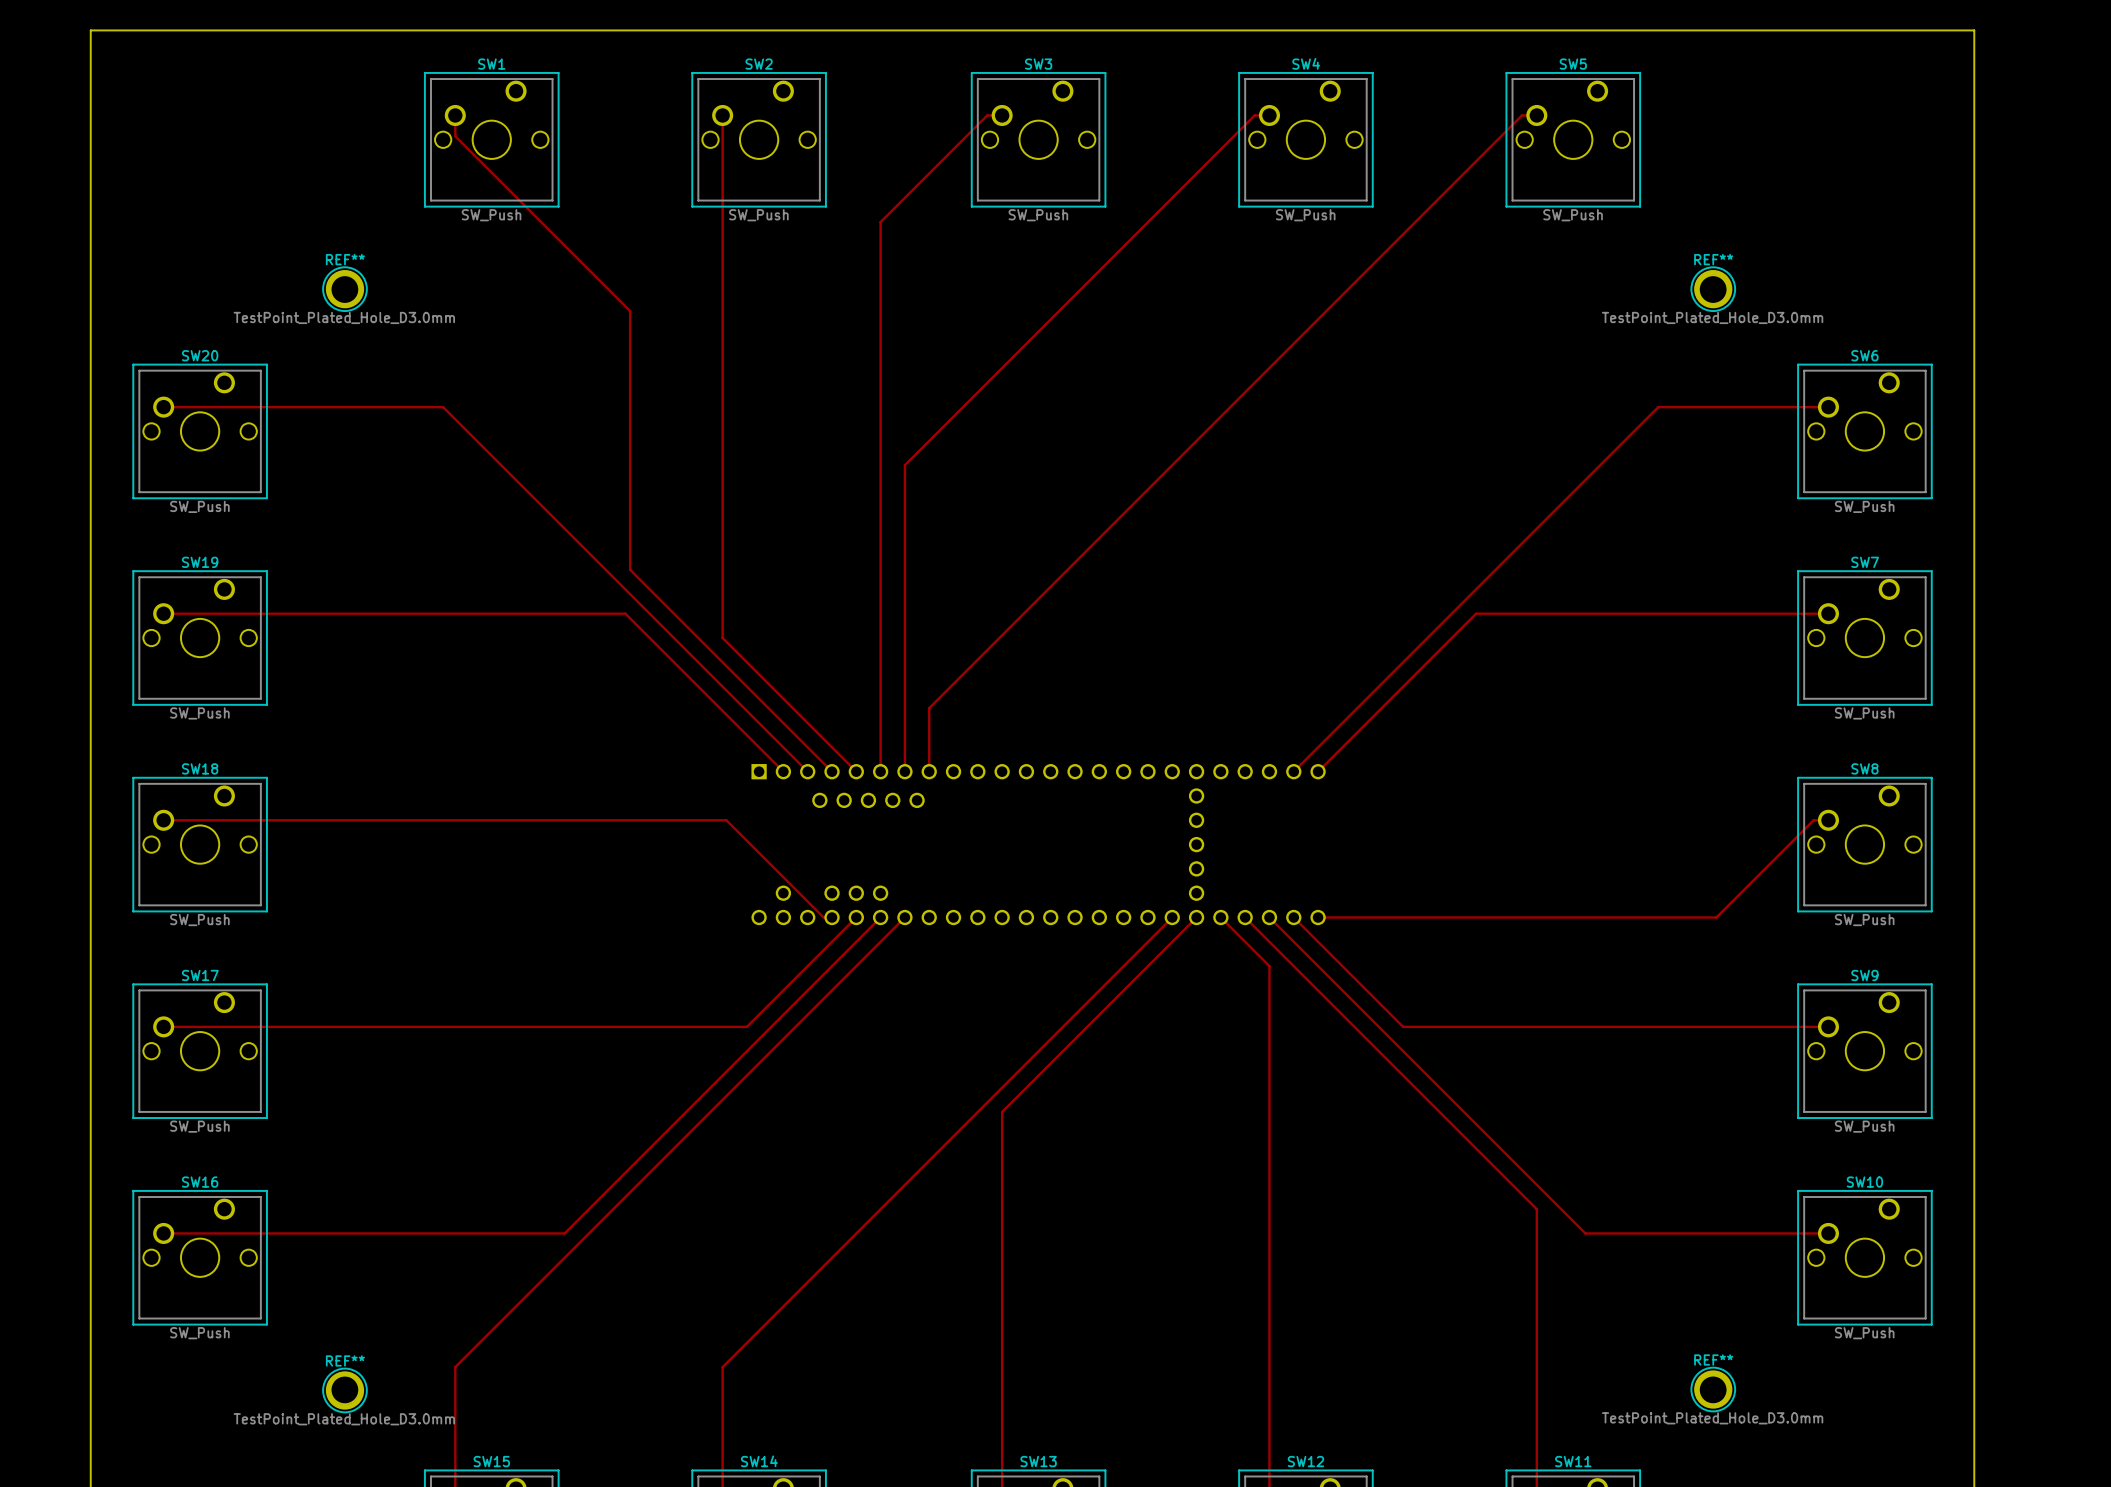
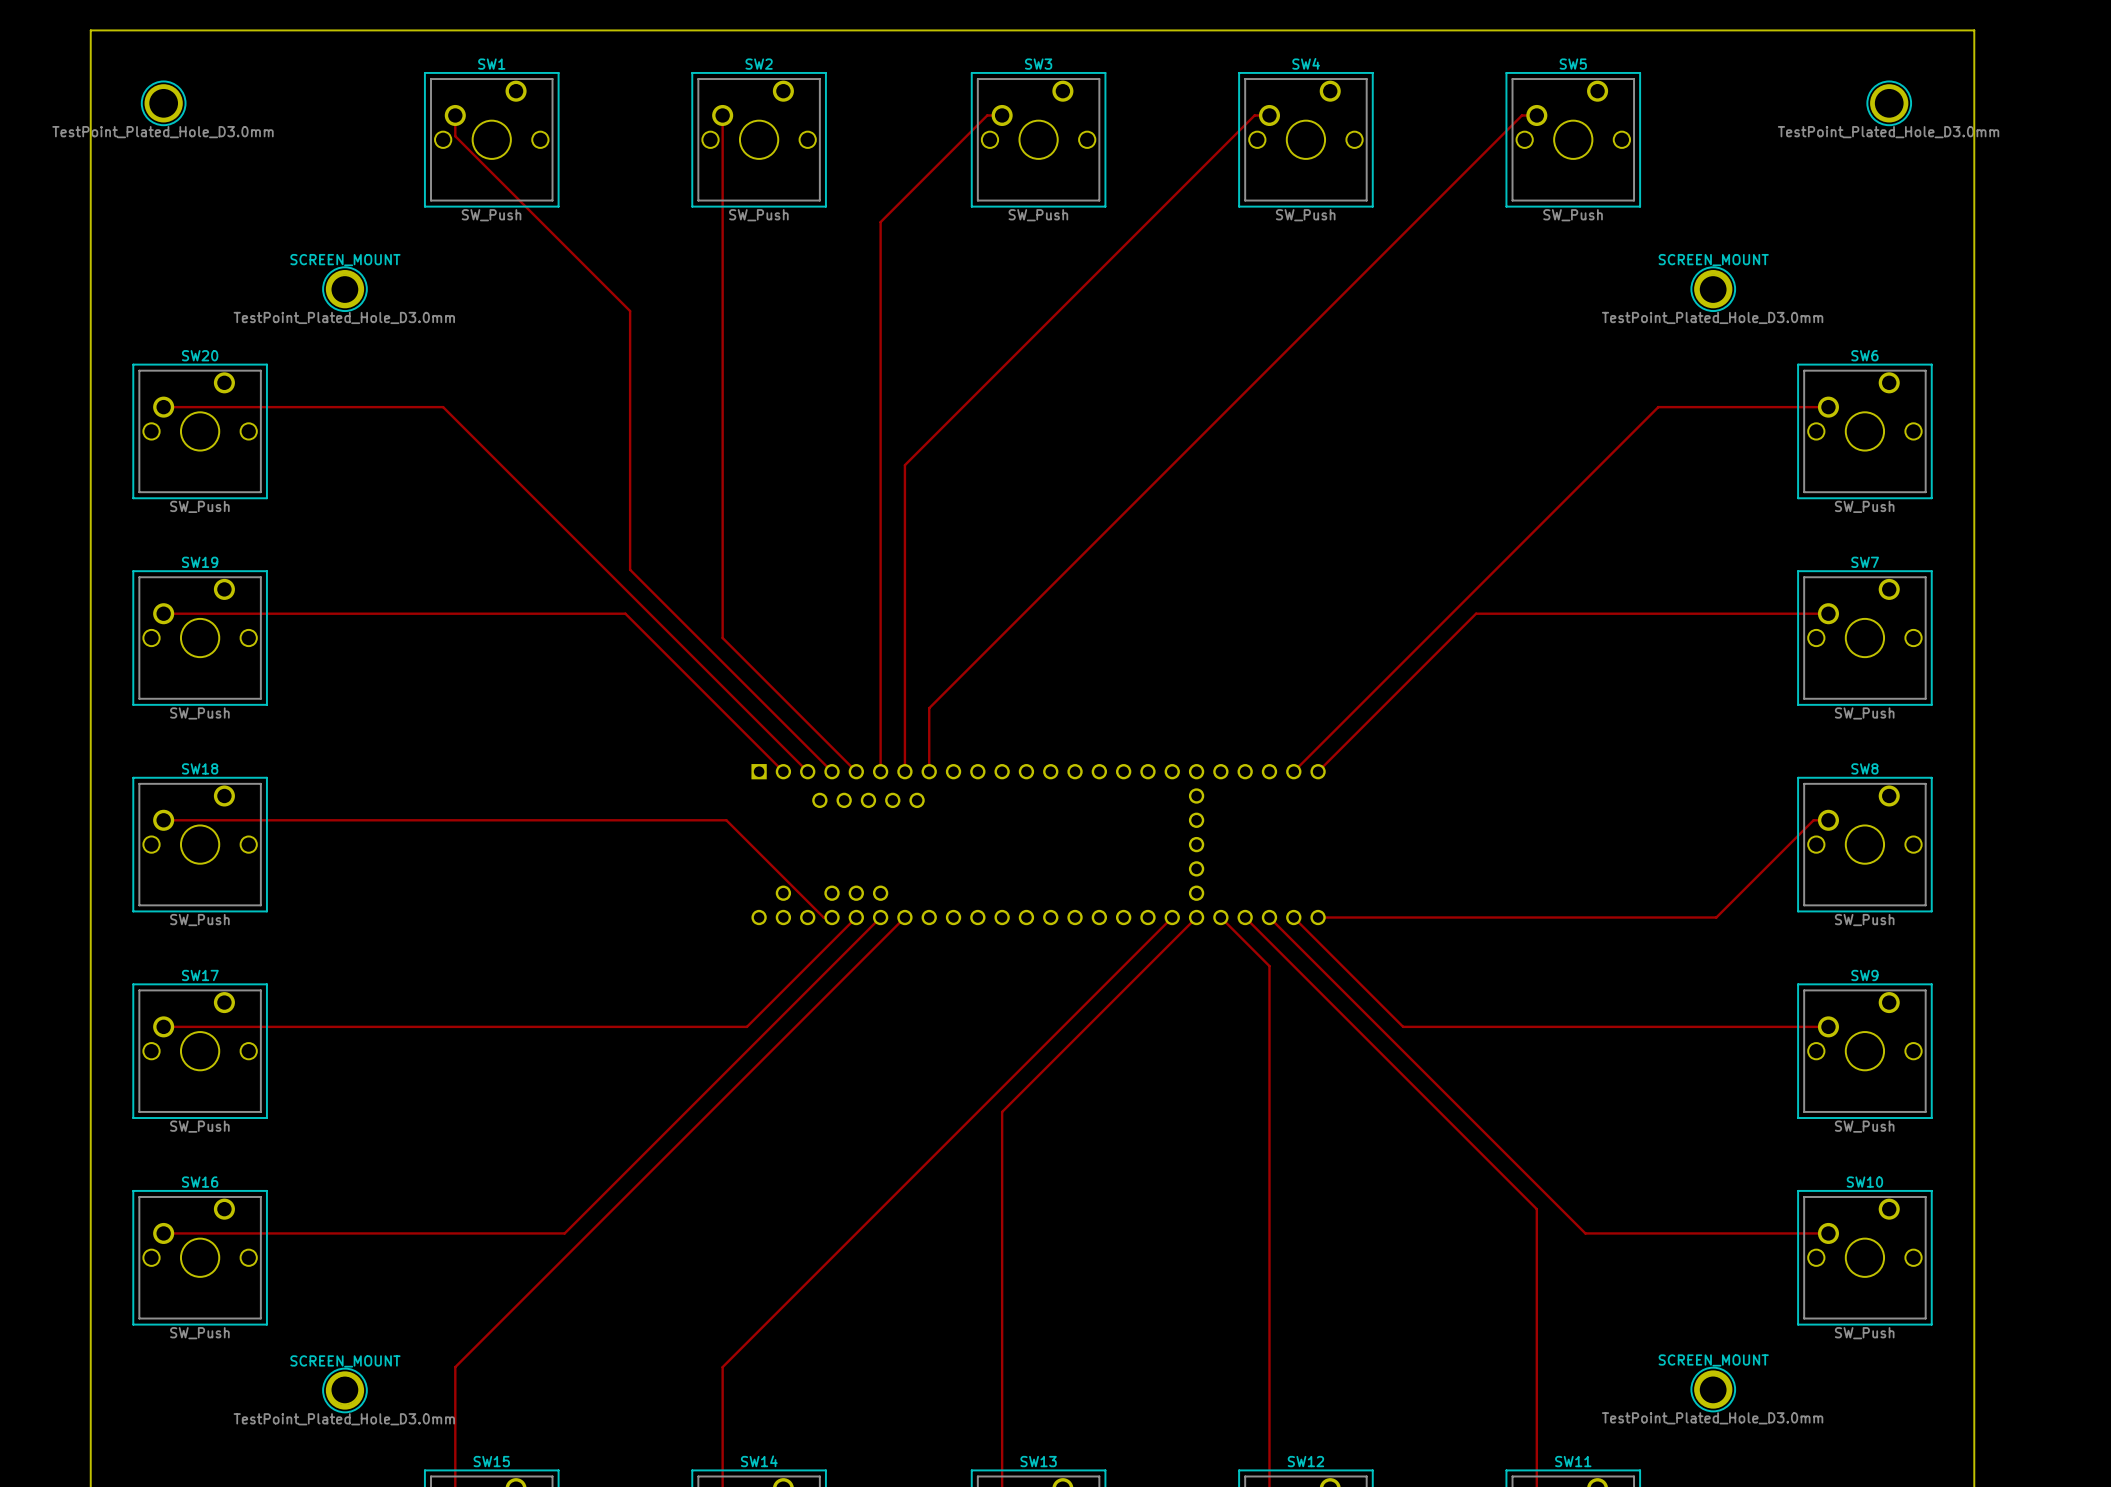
part: none -> TestPoint_Plated_Hole_D3.0mm (163, 103)
part: none -> TestPoint_Plated_Hole_D3.0mm (1889, 103)
REF** name: REF** (345, 259) -> SCREEN_MOUNT (345, 260)
REF** name: REF** (1713, 259) -> SCREEN_MOUNT (1713, 260)
REF** name: REF** (1713, 1359) -> SCREEN_MOUNT (1713, 1360)
REF** name: REF** (345, 1360) -> SCREEN_MOUNT (345, 1361)

